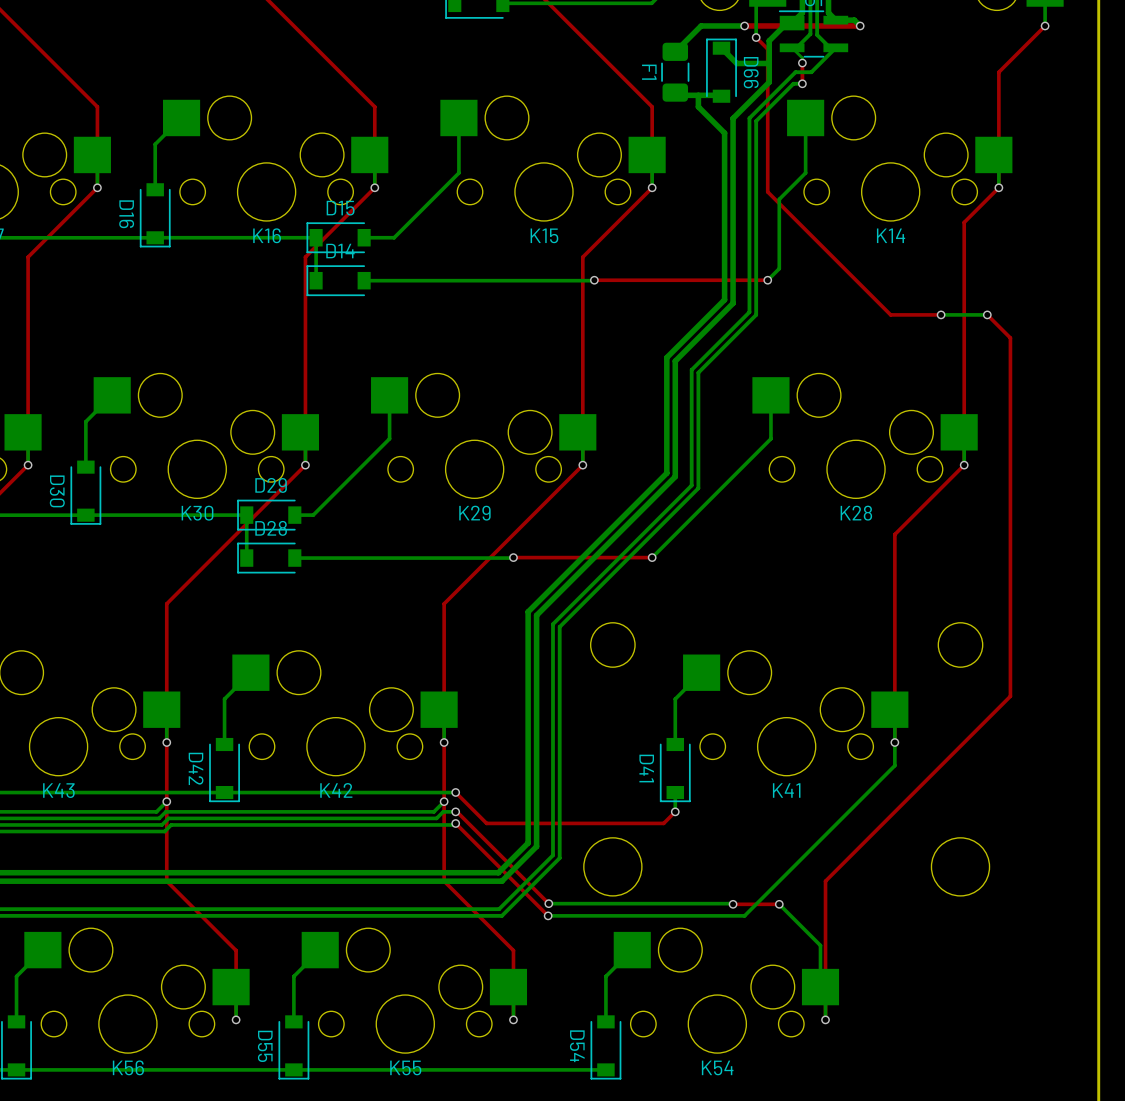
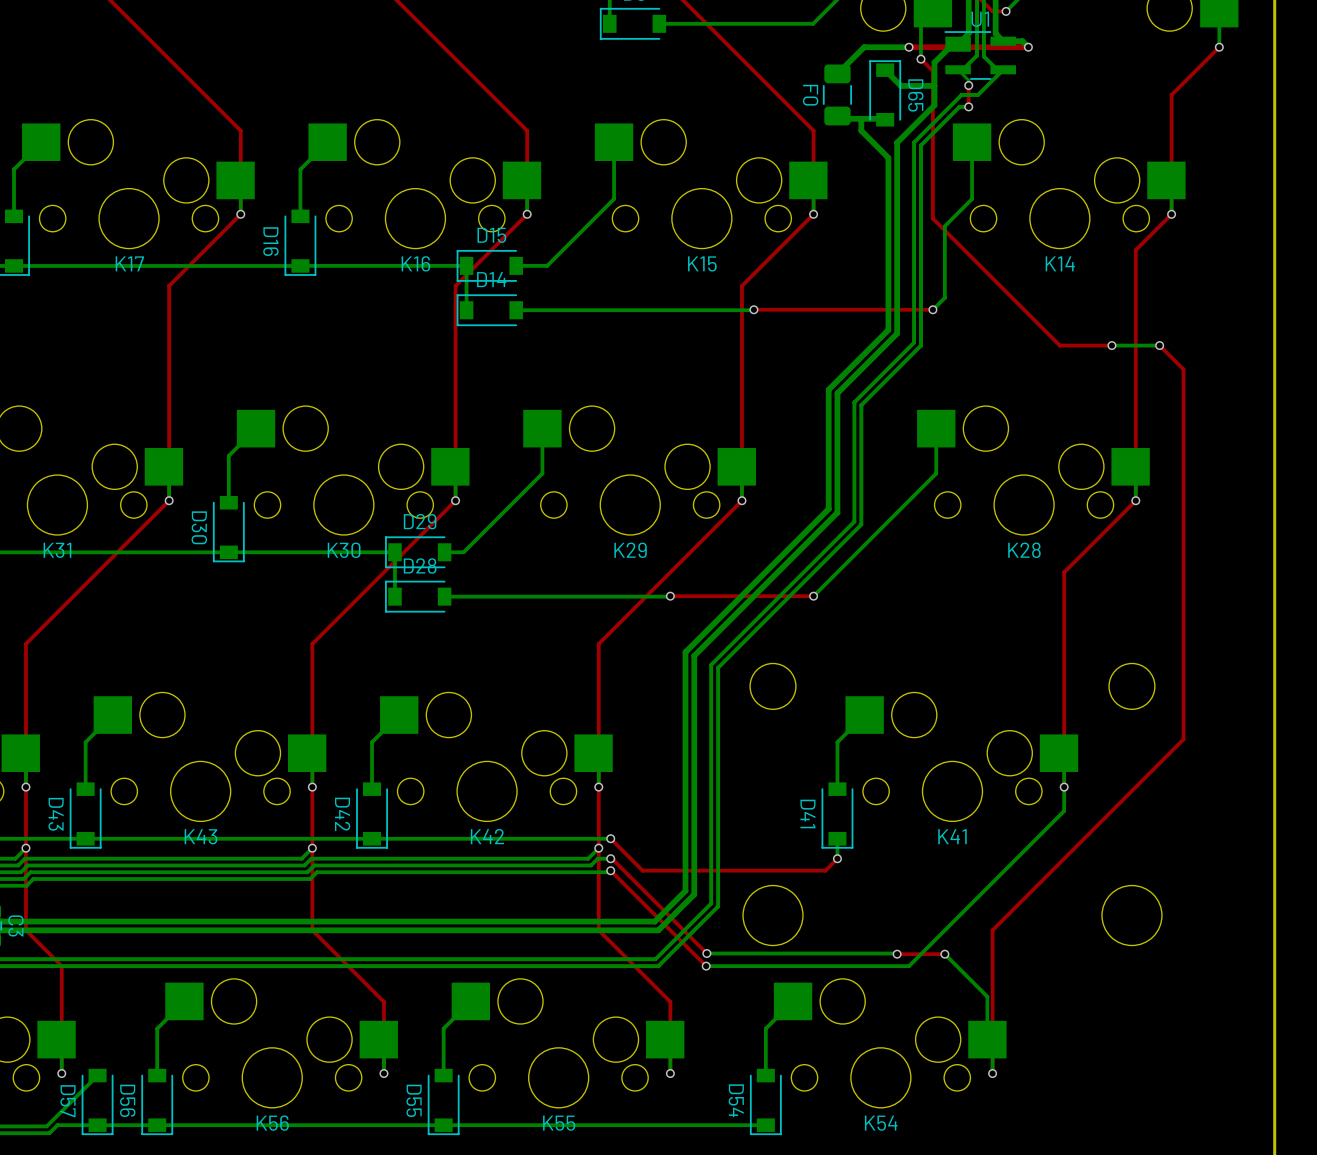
F1 name: F1 (649, 72) -> F0 (810, 95)
D66 name: D66 (751, 72) -> D65 (915, 95)

